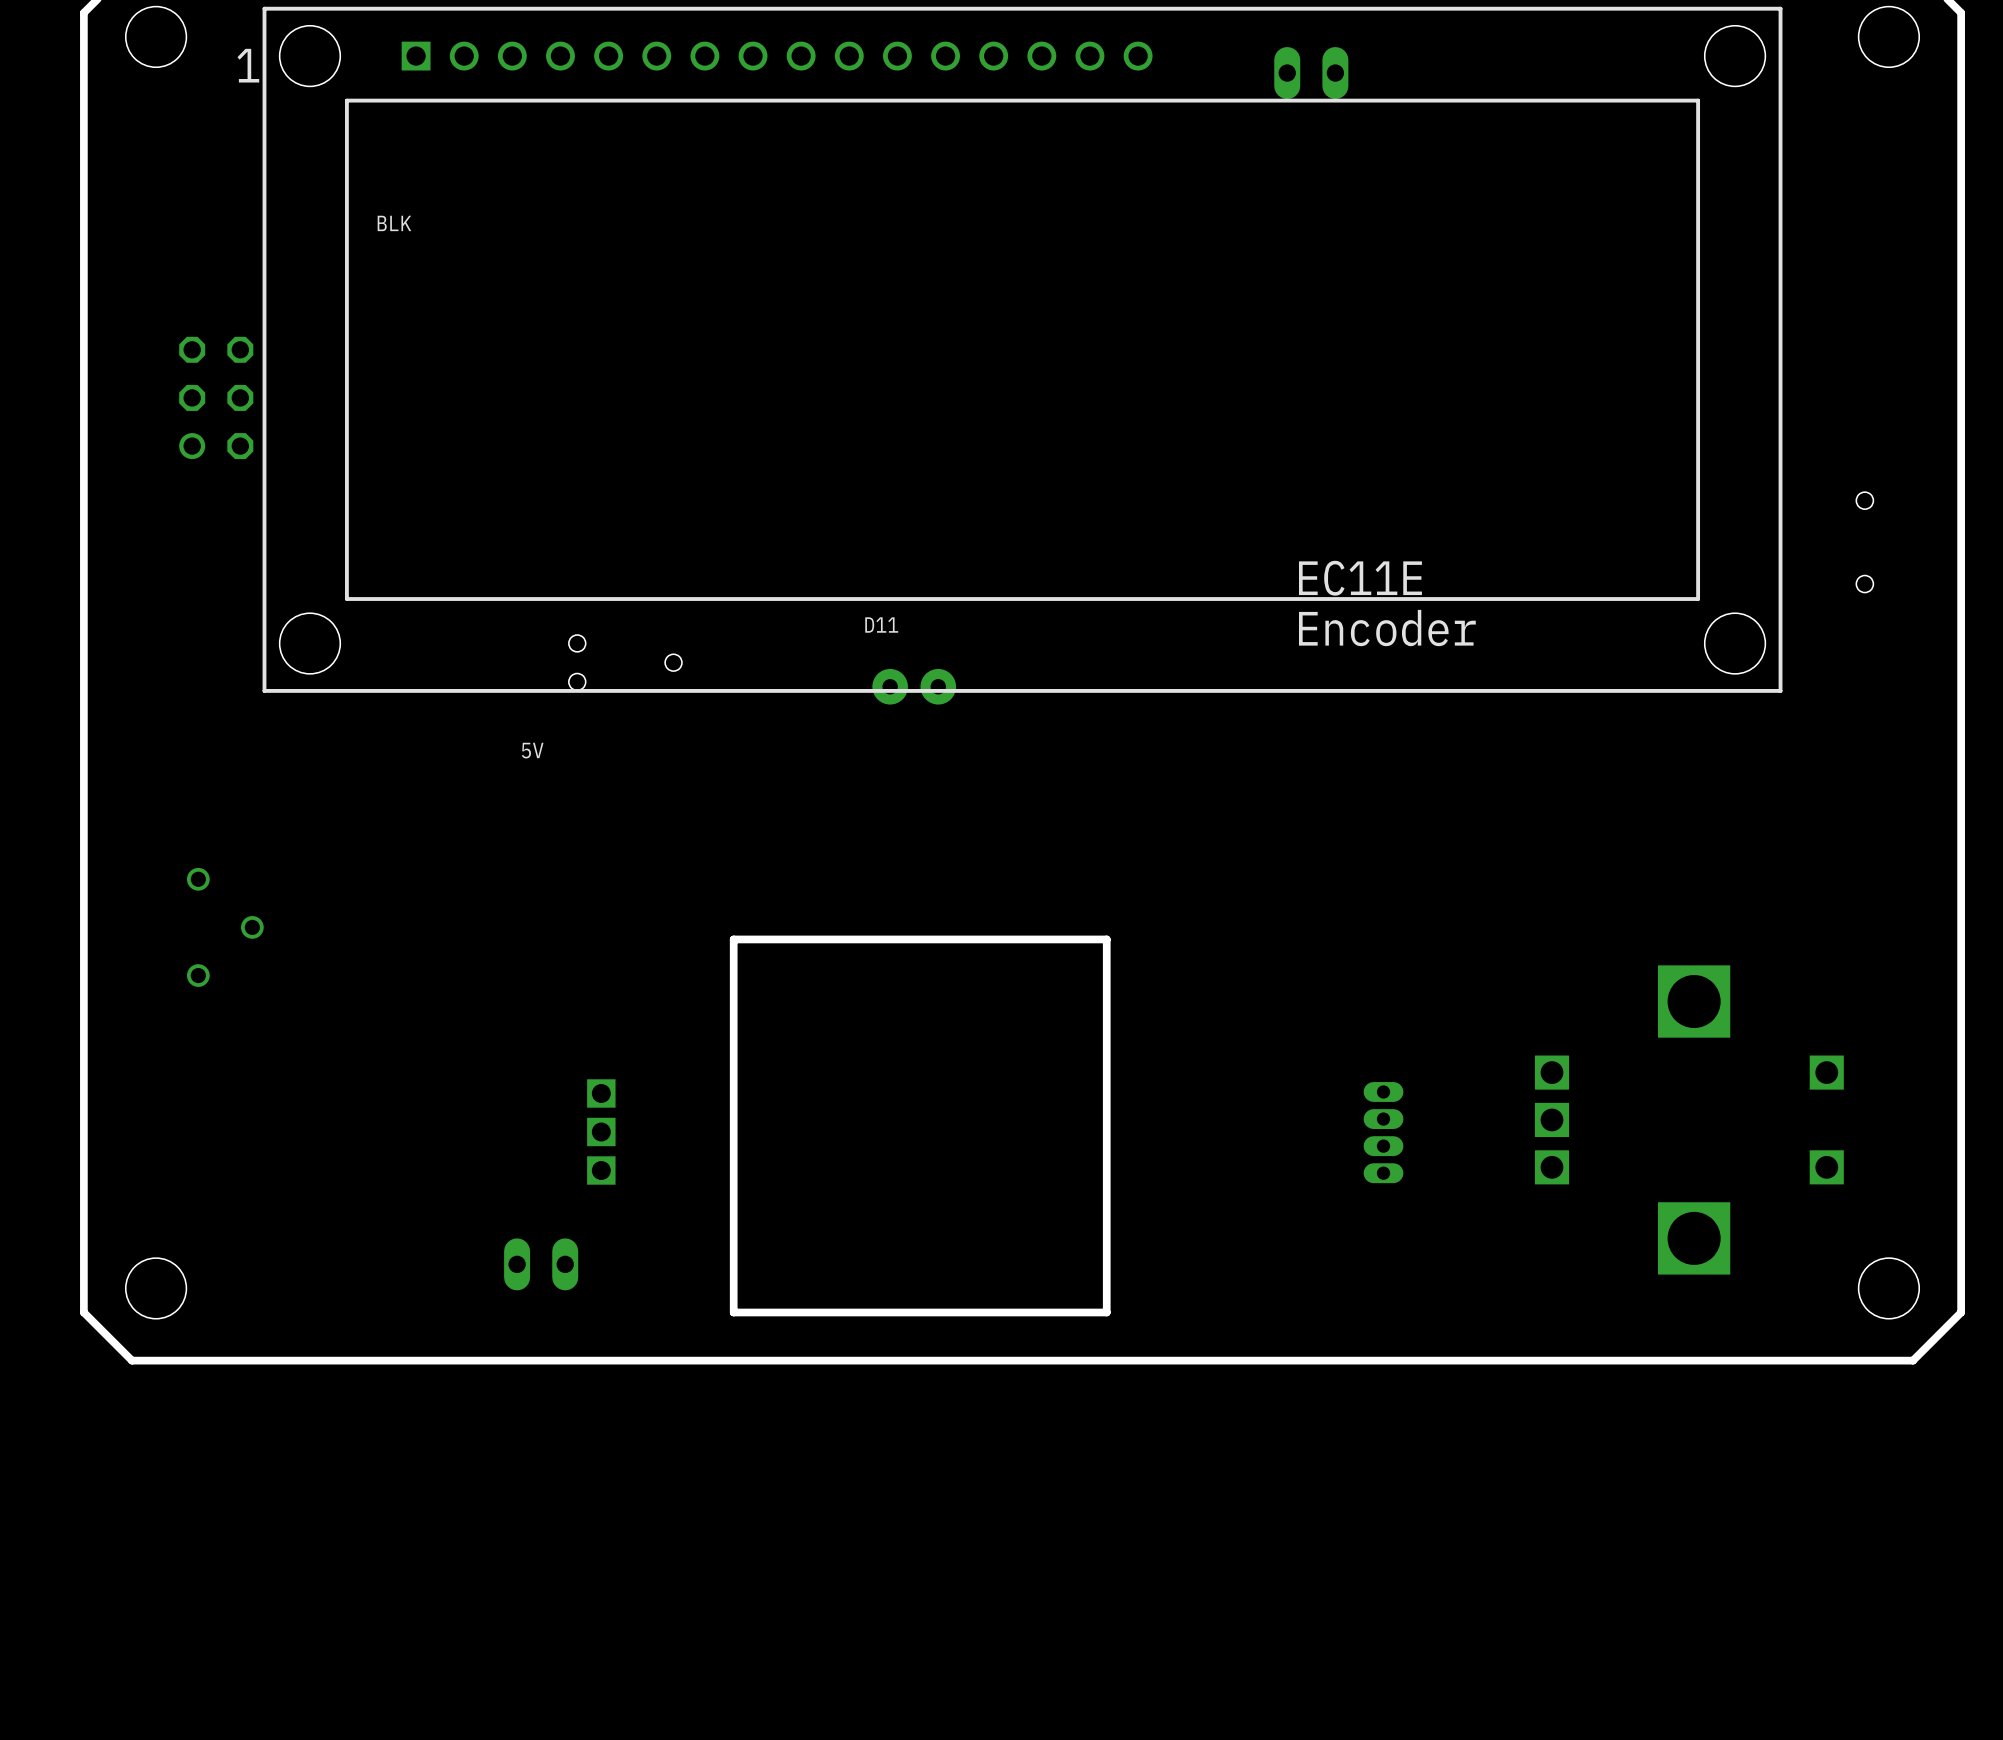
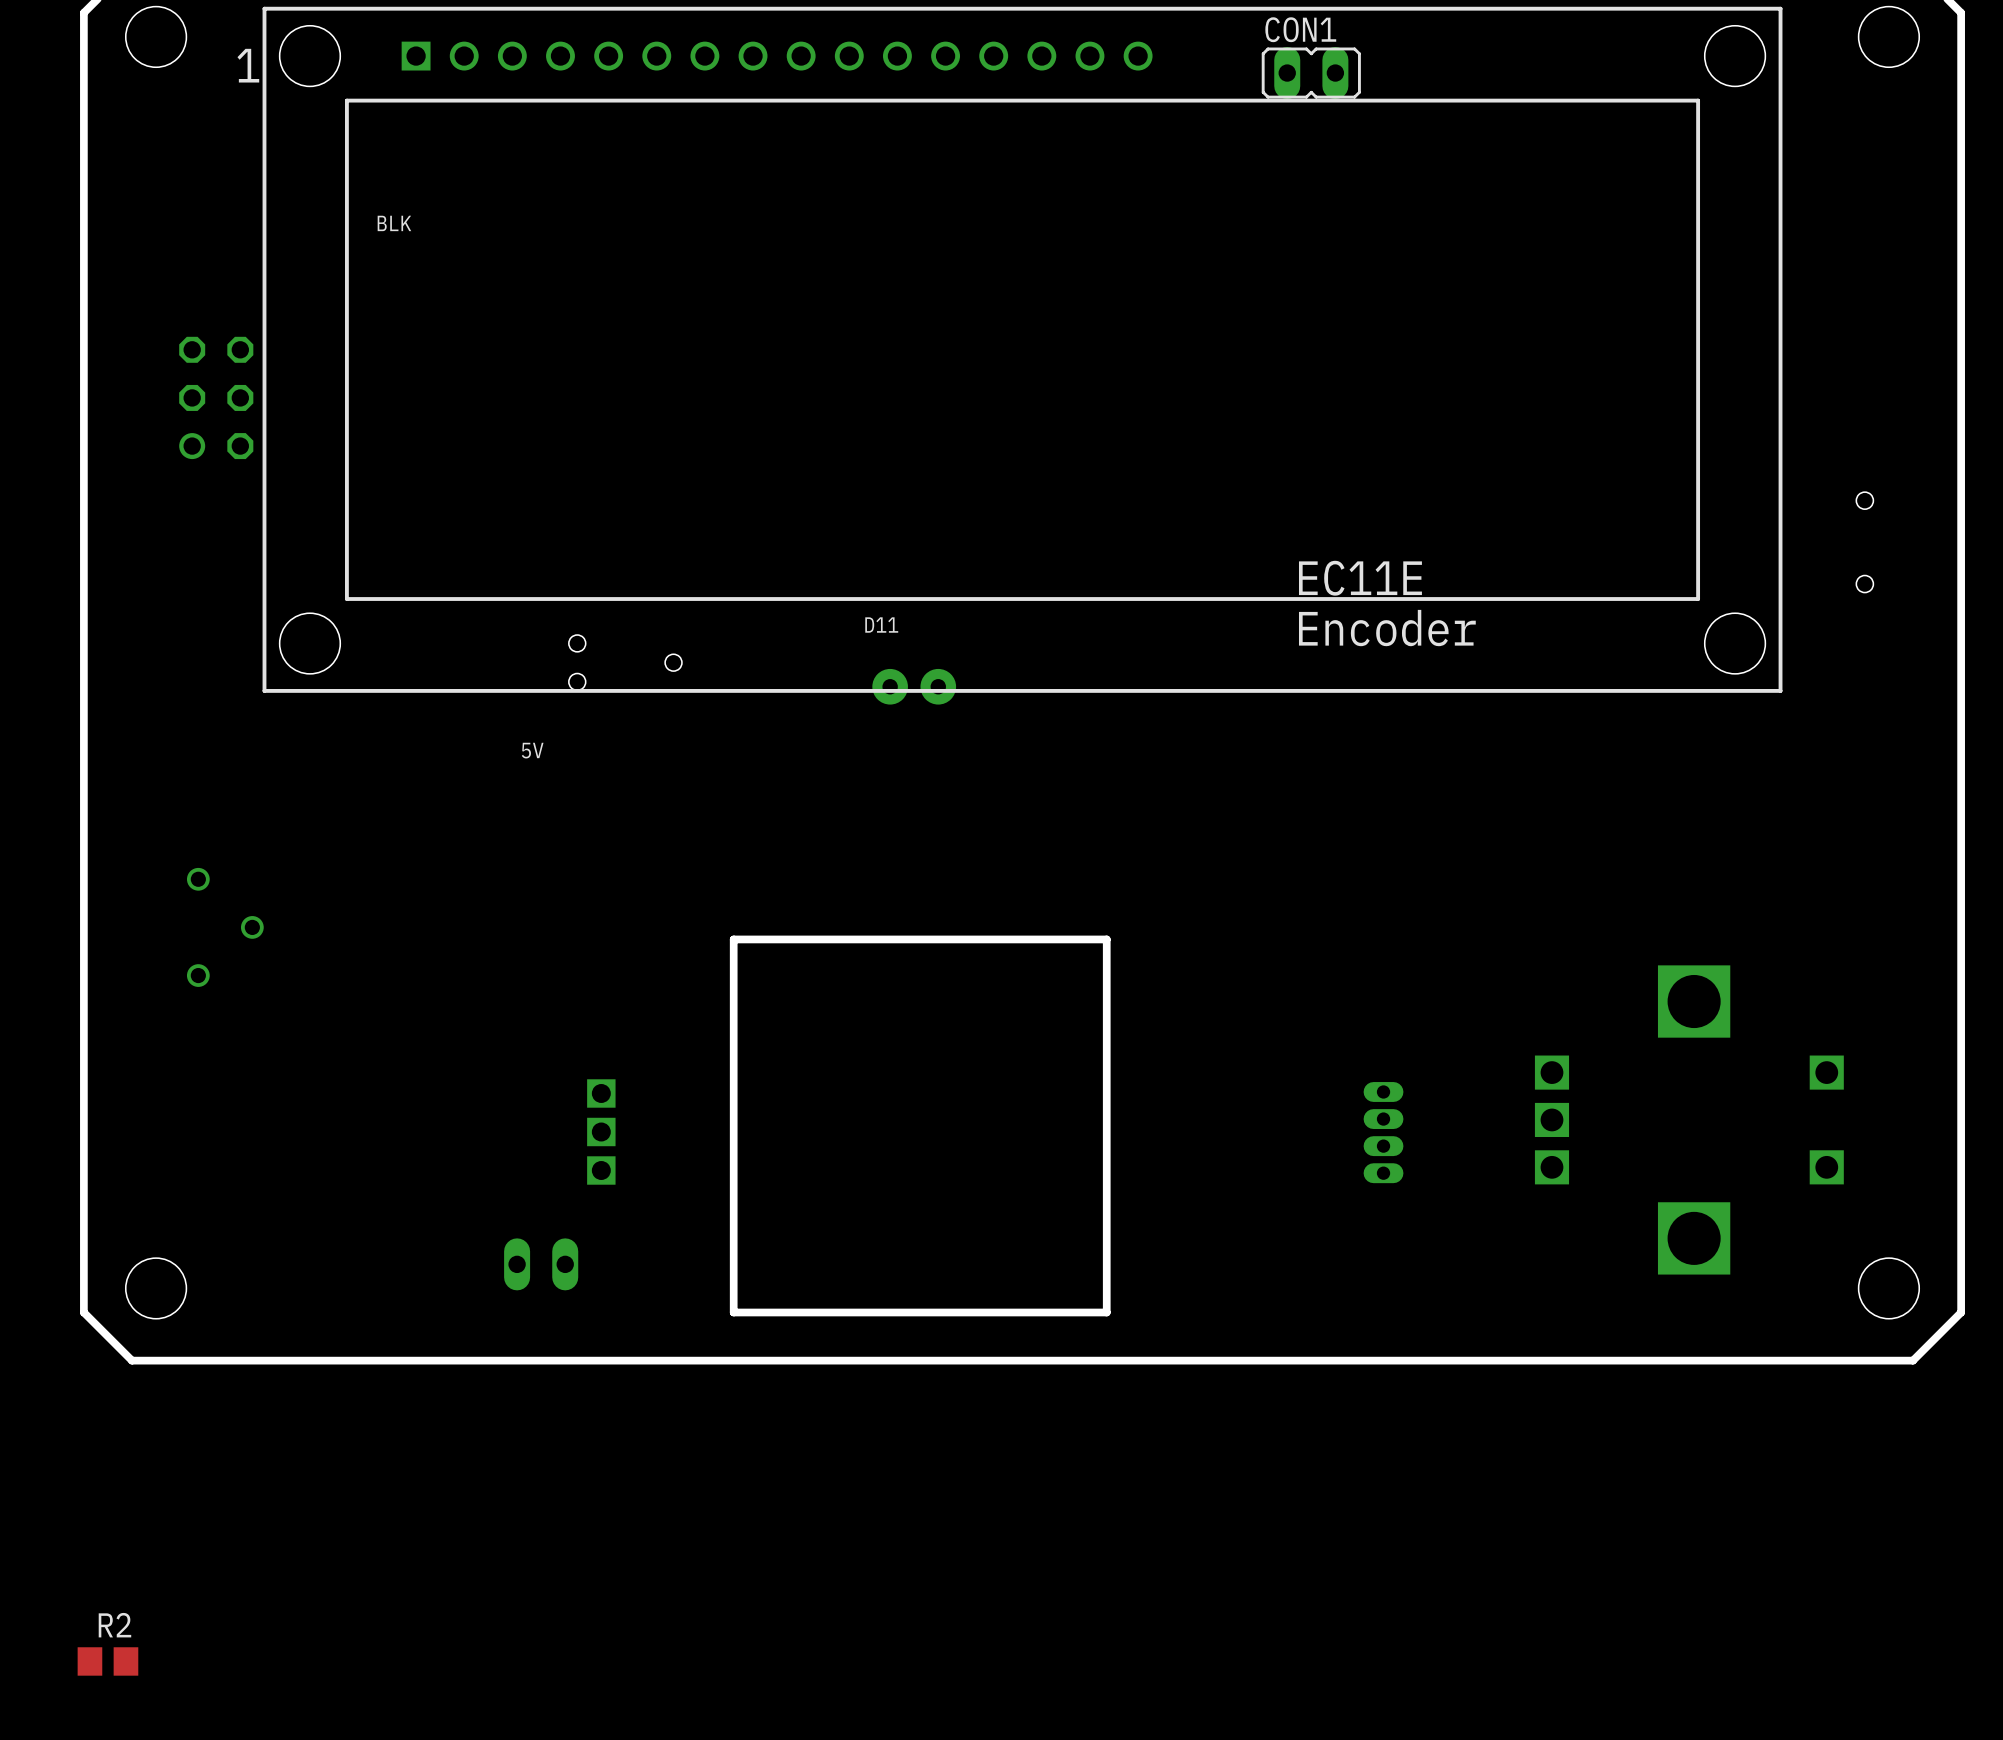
CON1 side: bottom (1311, 73) -> top (1311, 73)
R2: none -> (107, 1661)

